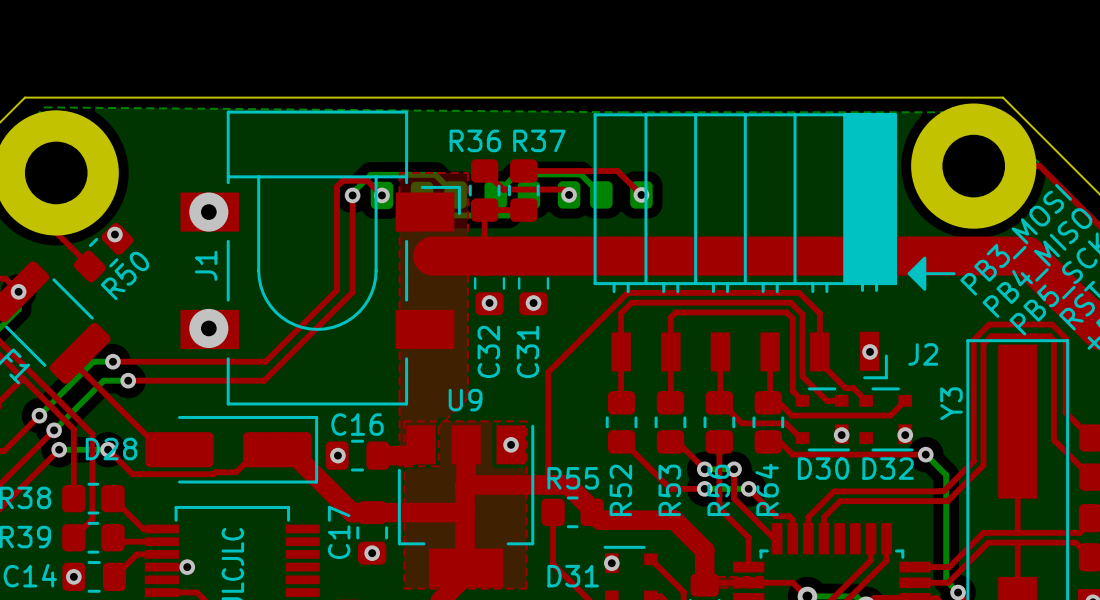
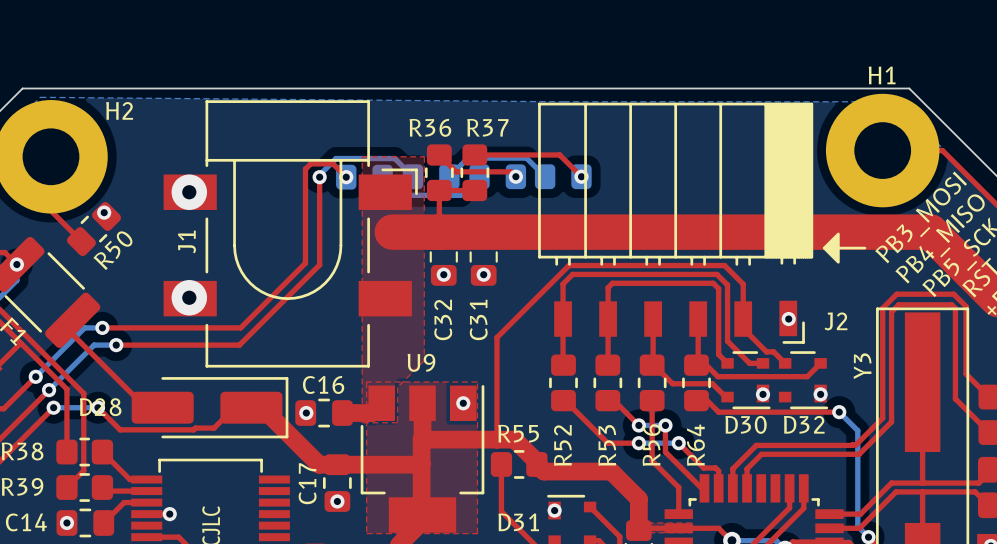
H1 name: none -> H1 (882, 75)
H2 name: none -> H2 (119, 110)

